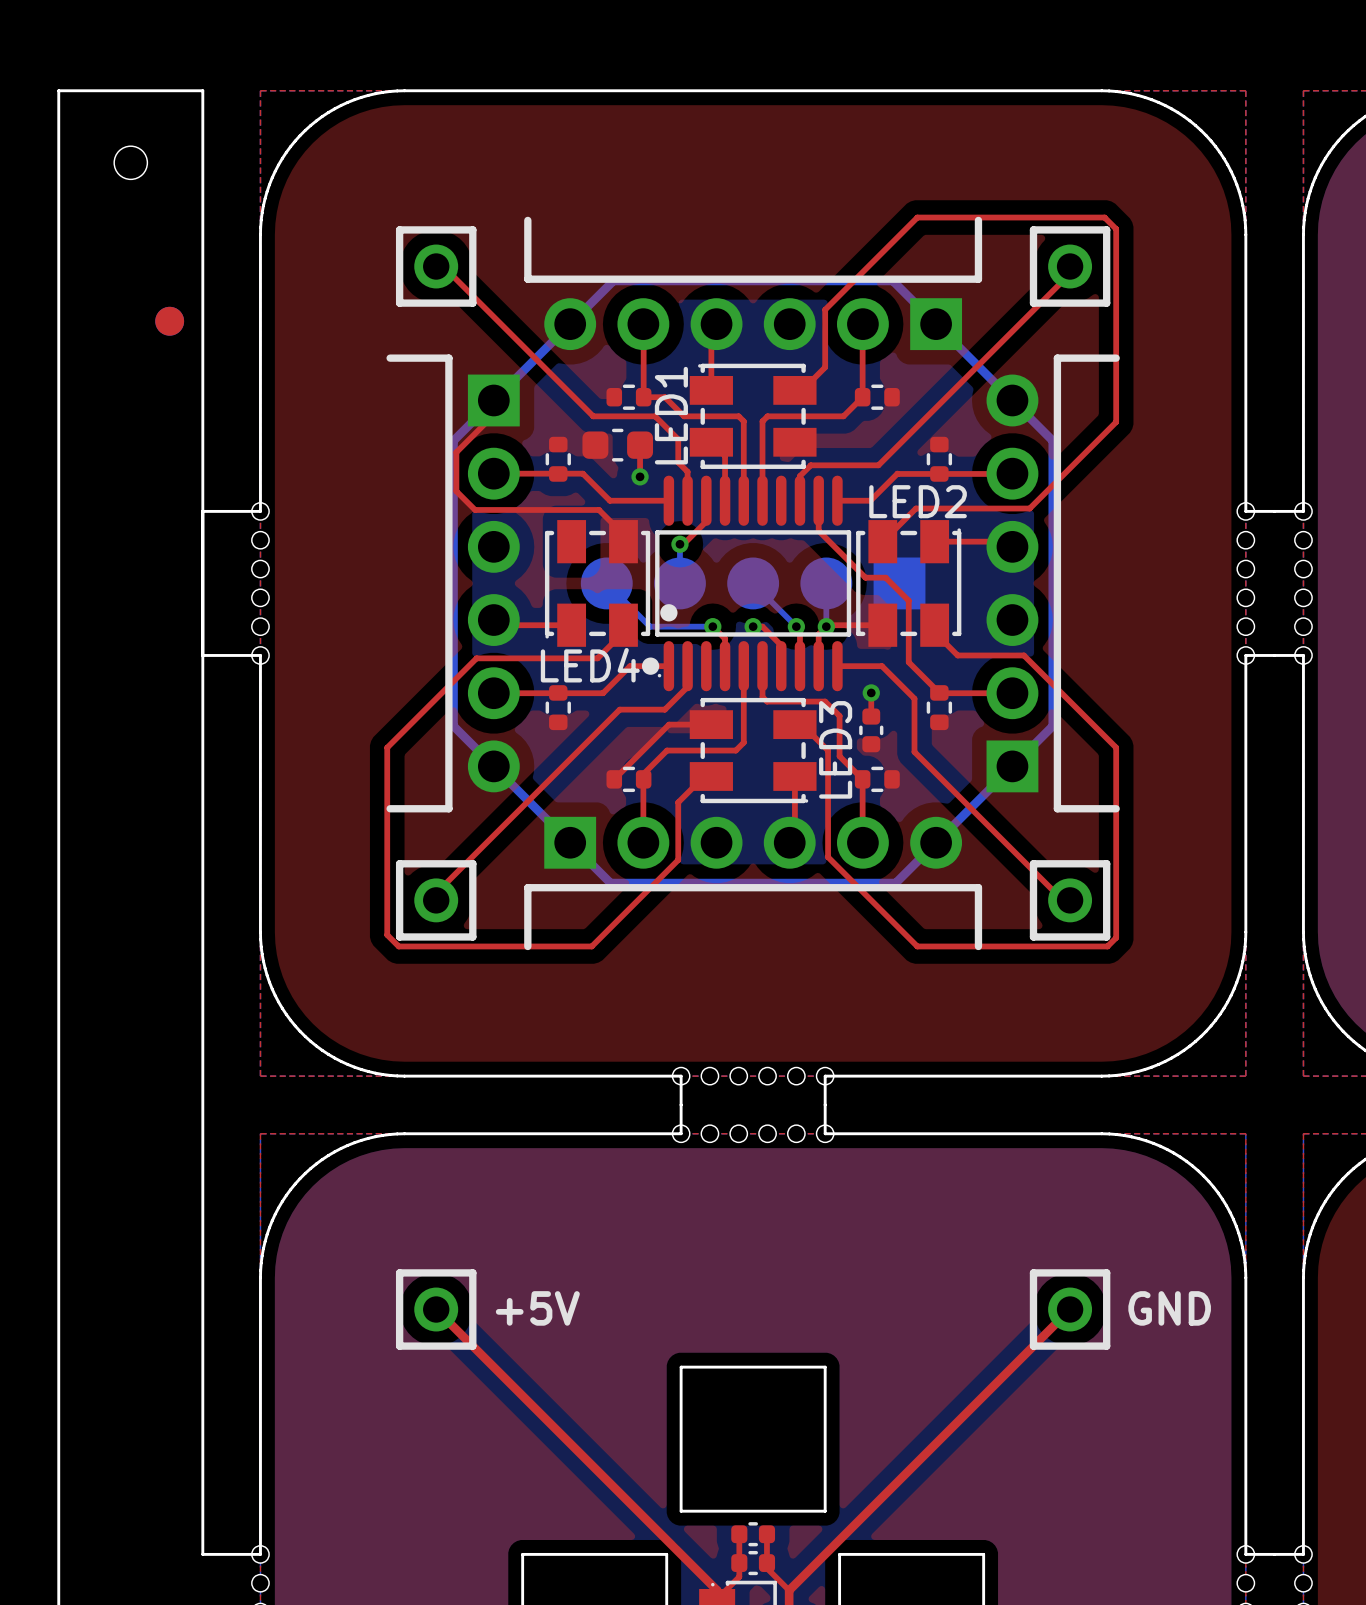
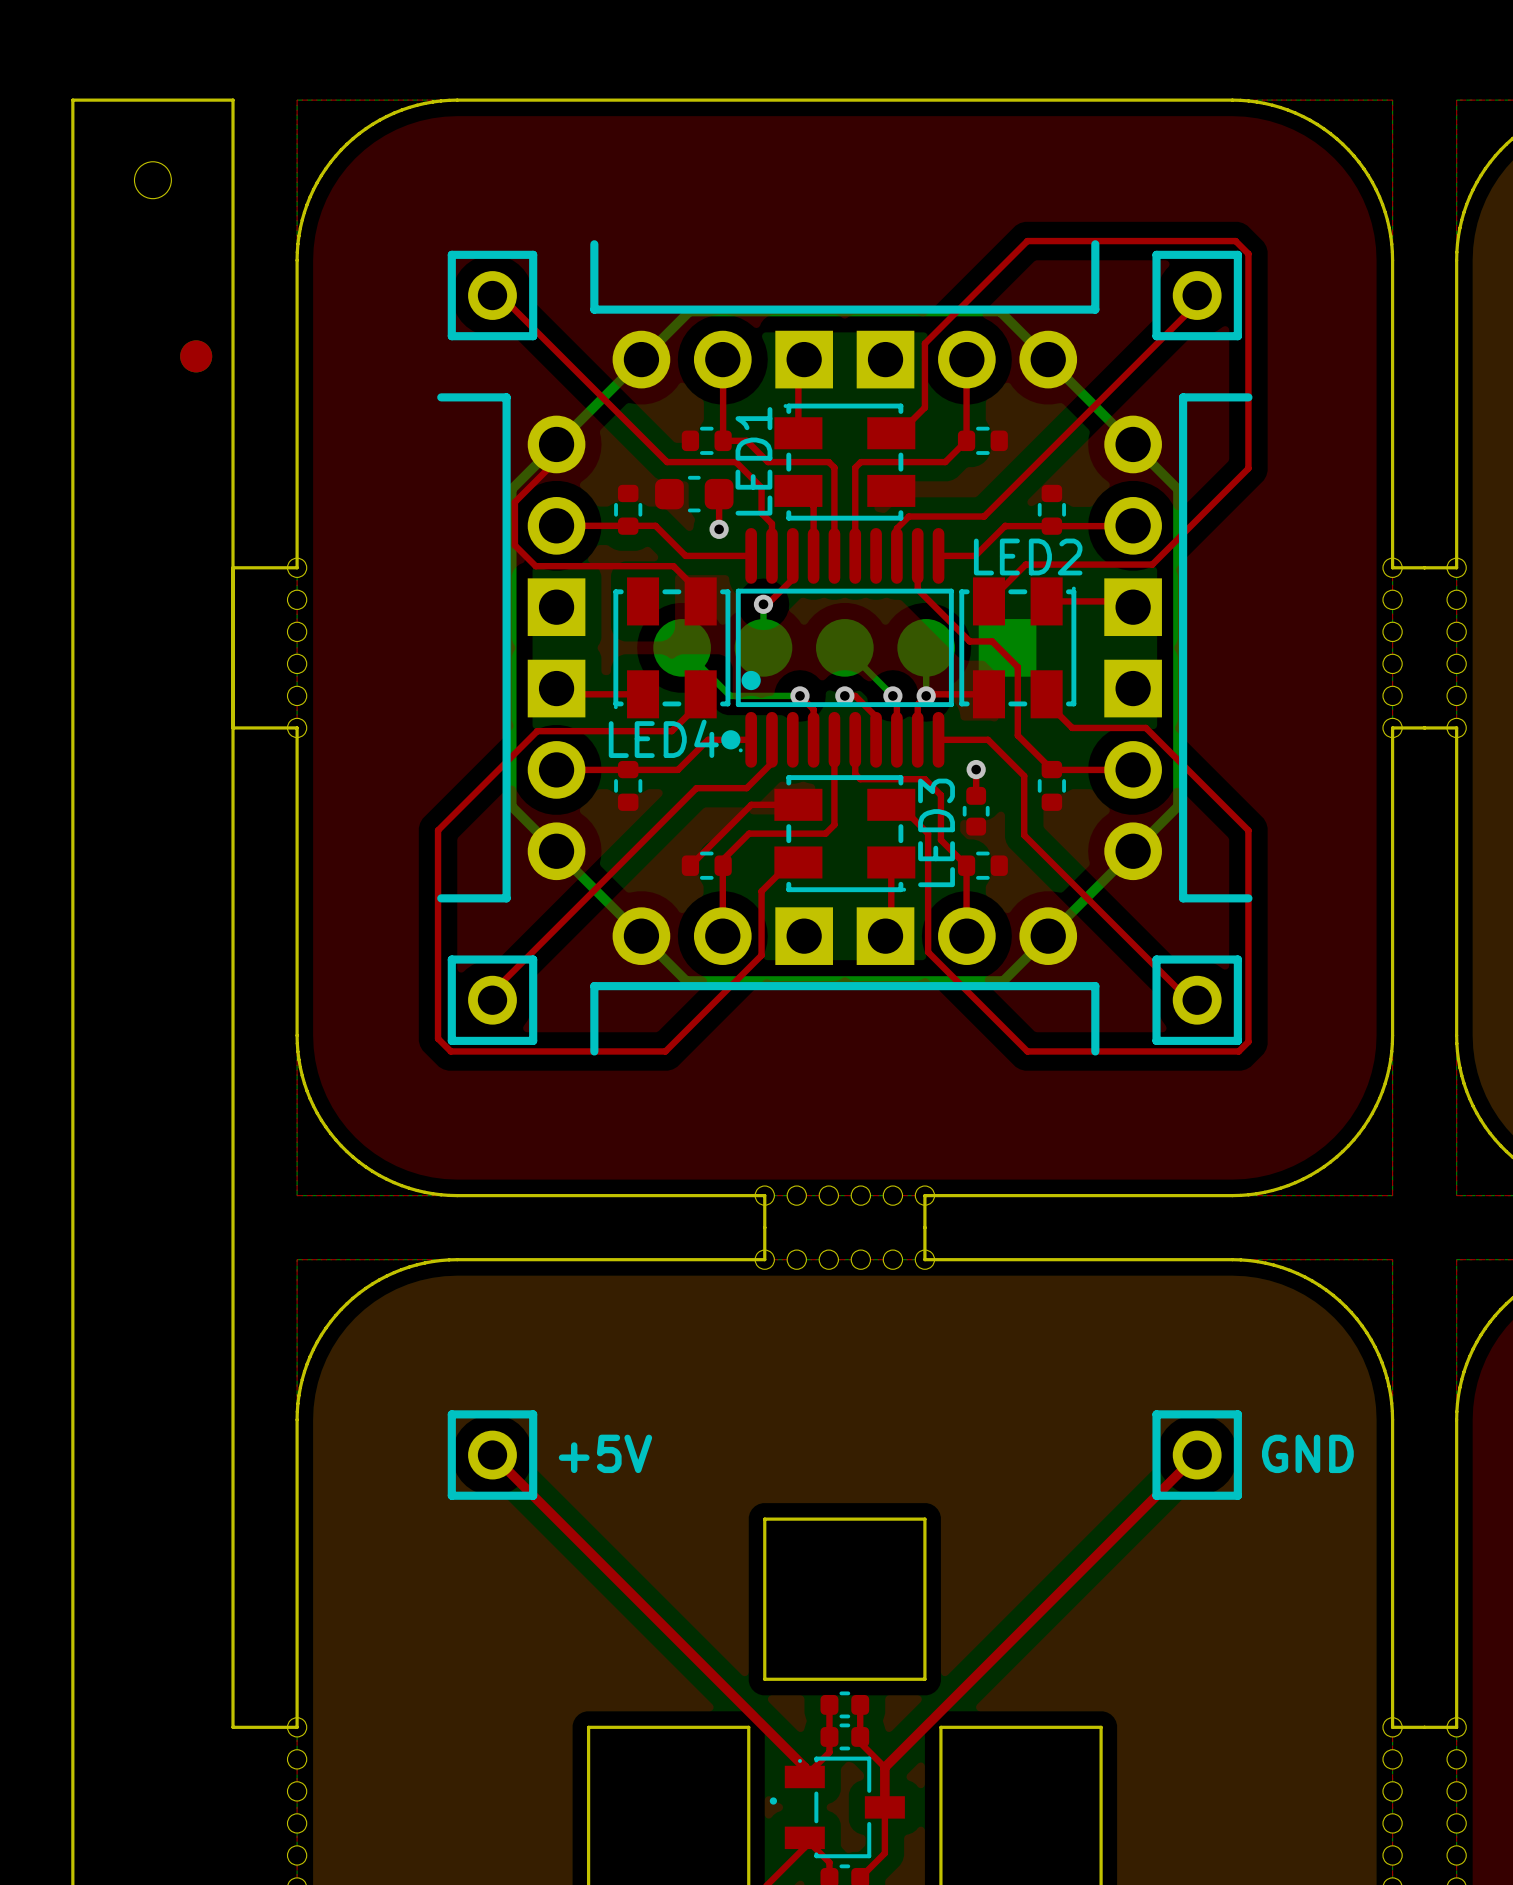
part footprint: [524, 216, 983, 351] -> [590, 240, 1100, 389]
part footprint: [386, 354, 520, 813] -> [437, 393, 586, 903]
part footprint: [986, 354, 1120, 813] -> [1104, 393, 1253, 903]
part footprint: [524, 816, 983, 951] -> [590, 907, 1100, 1056]

